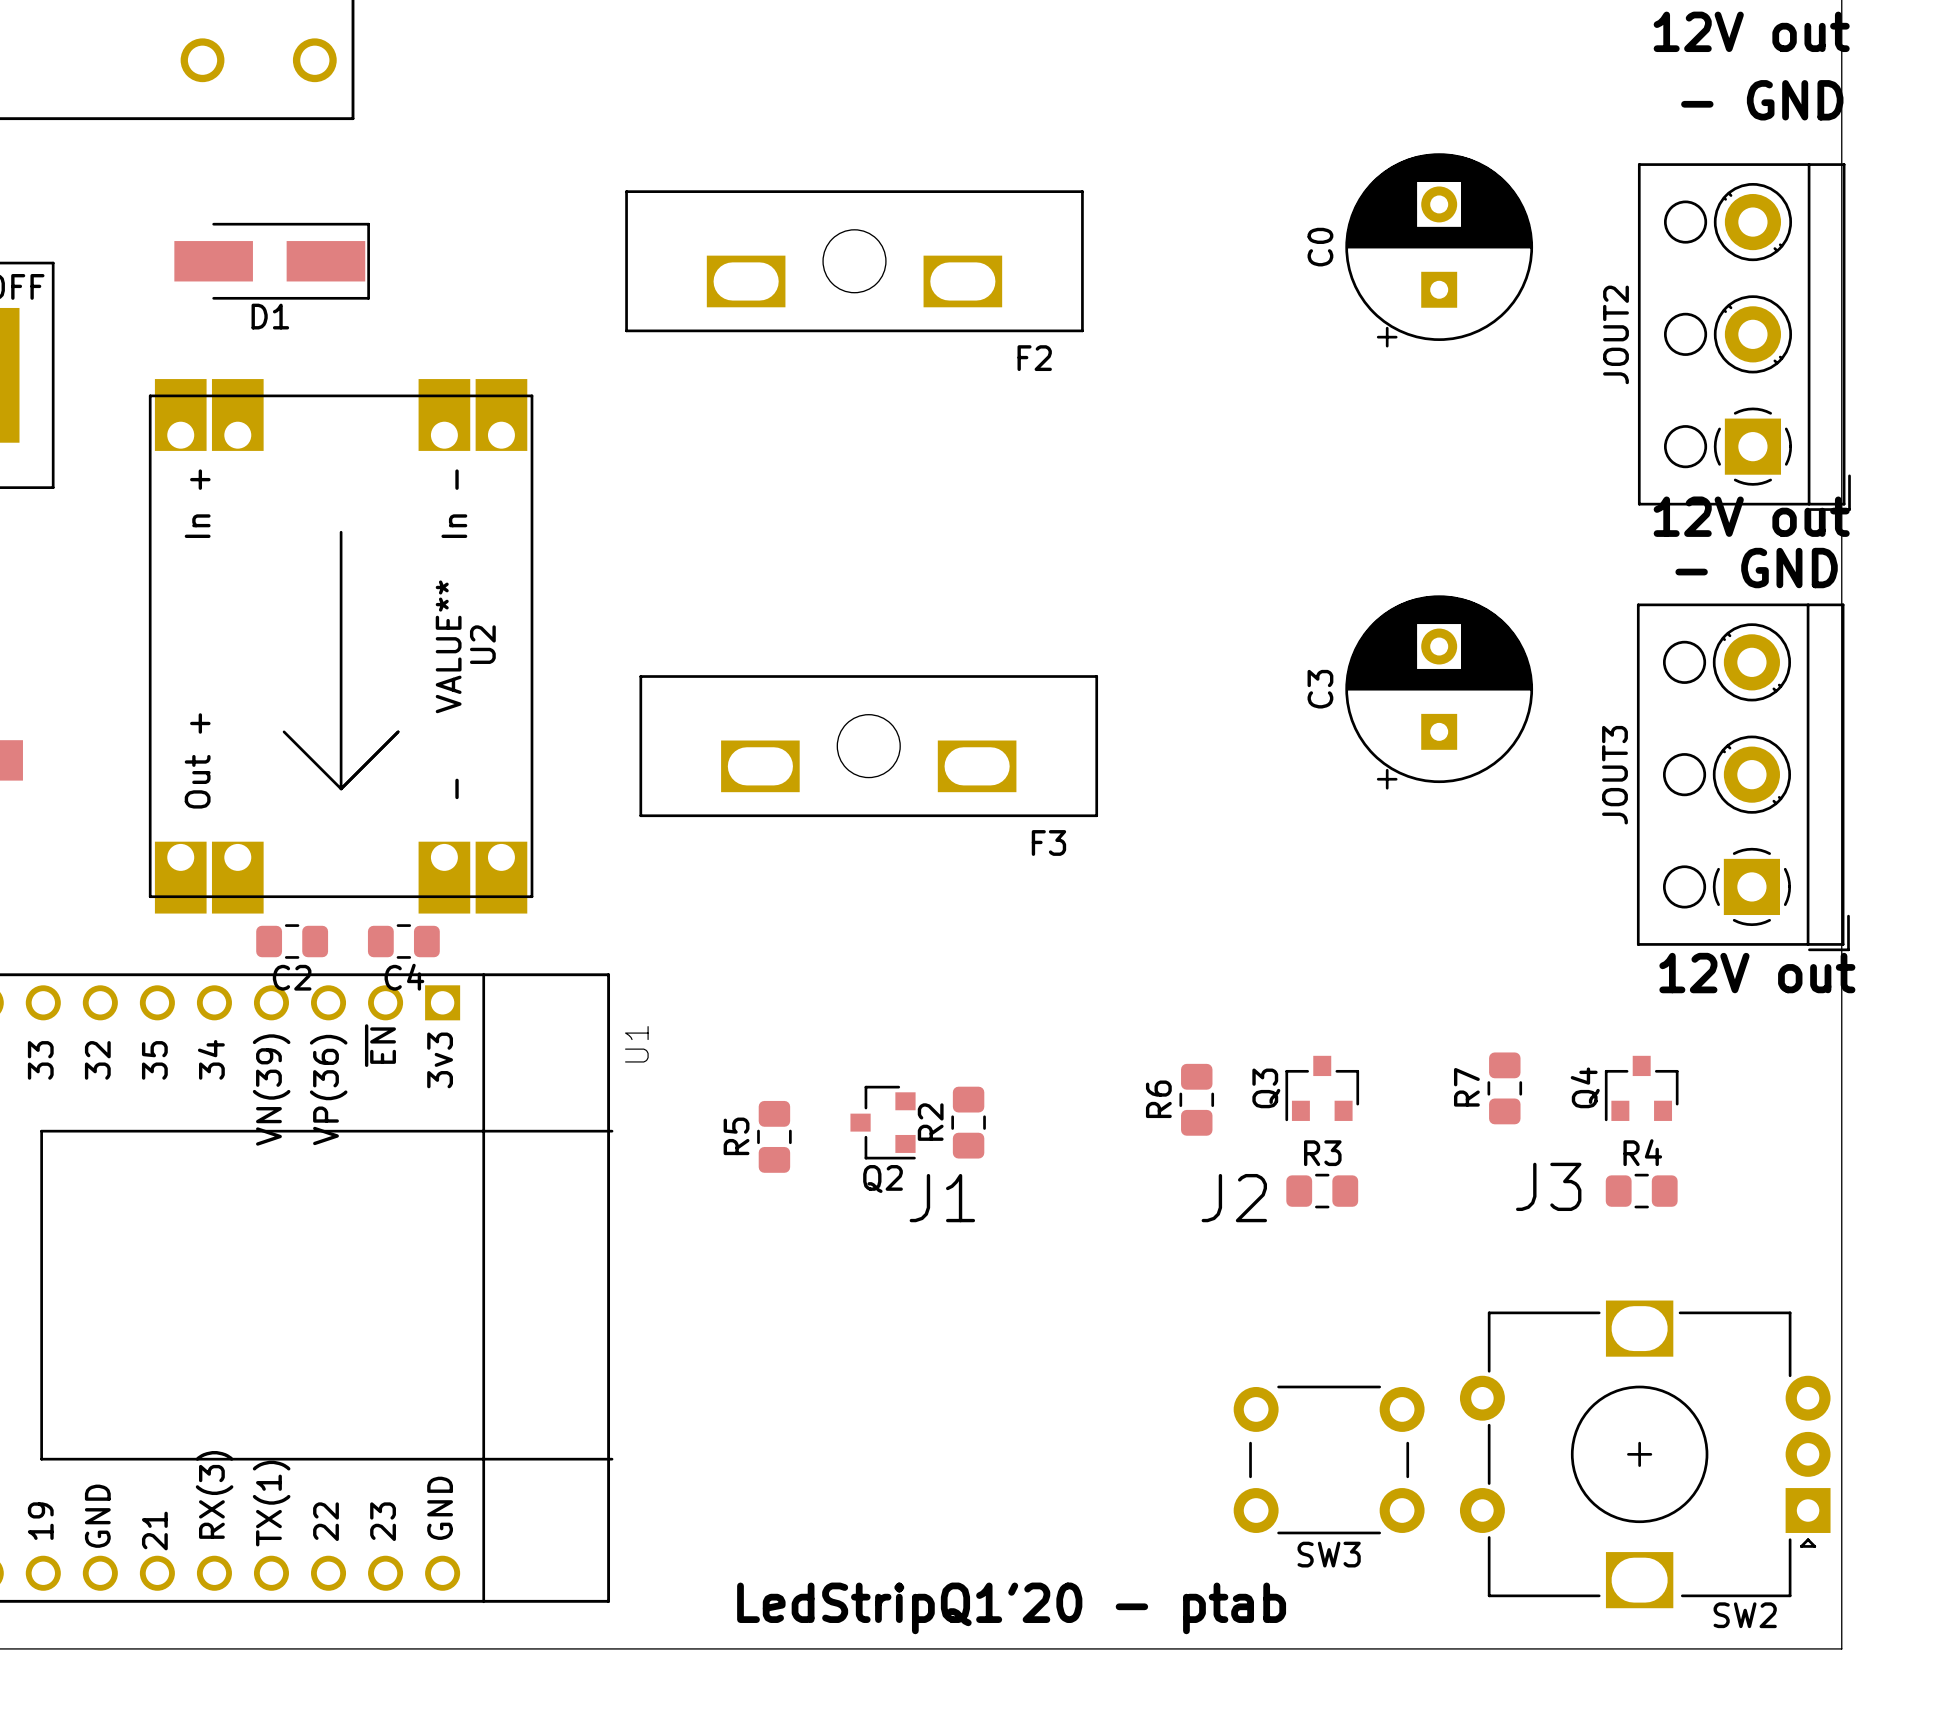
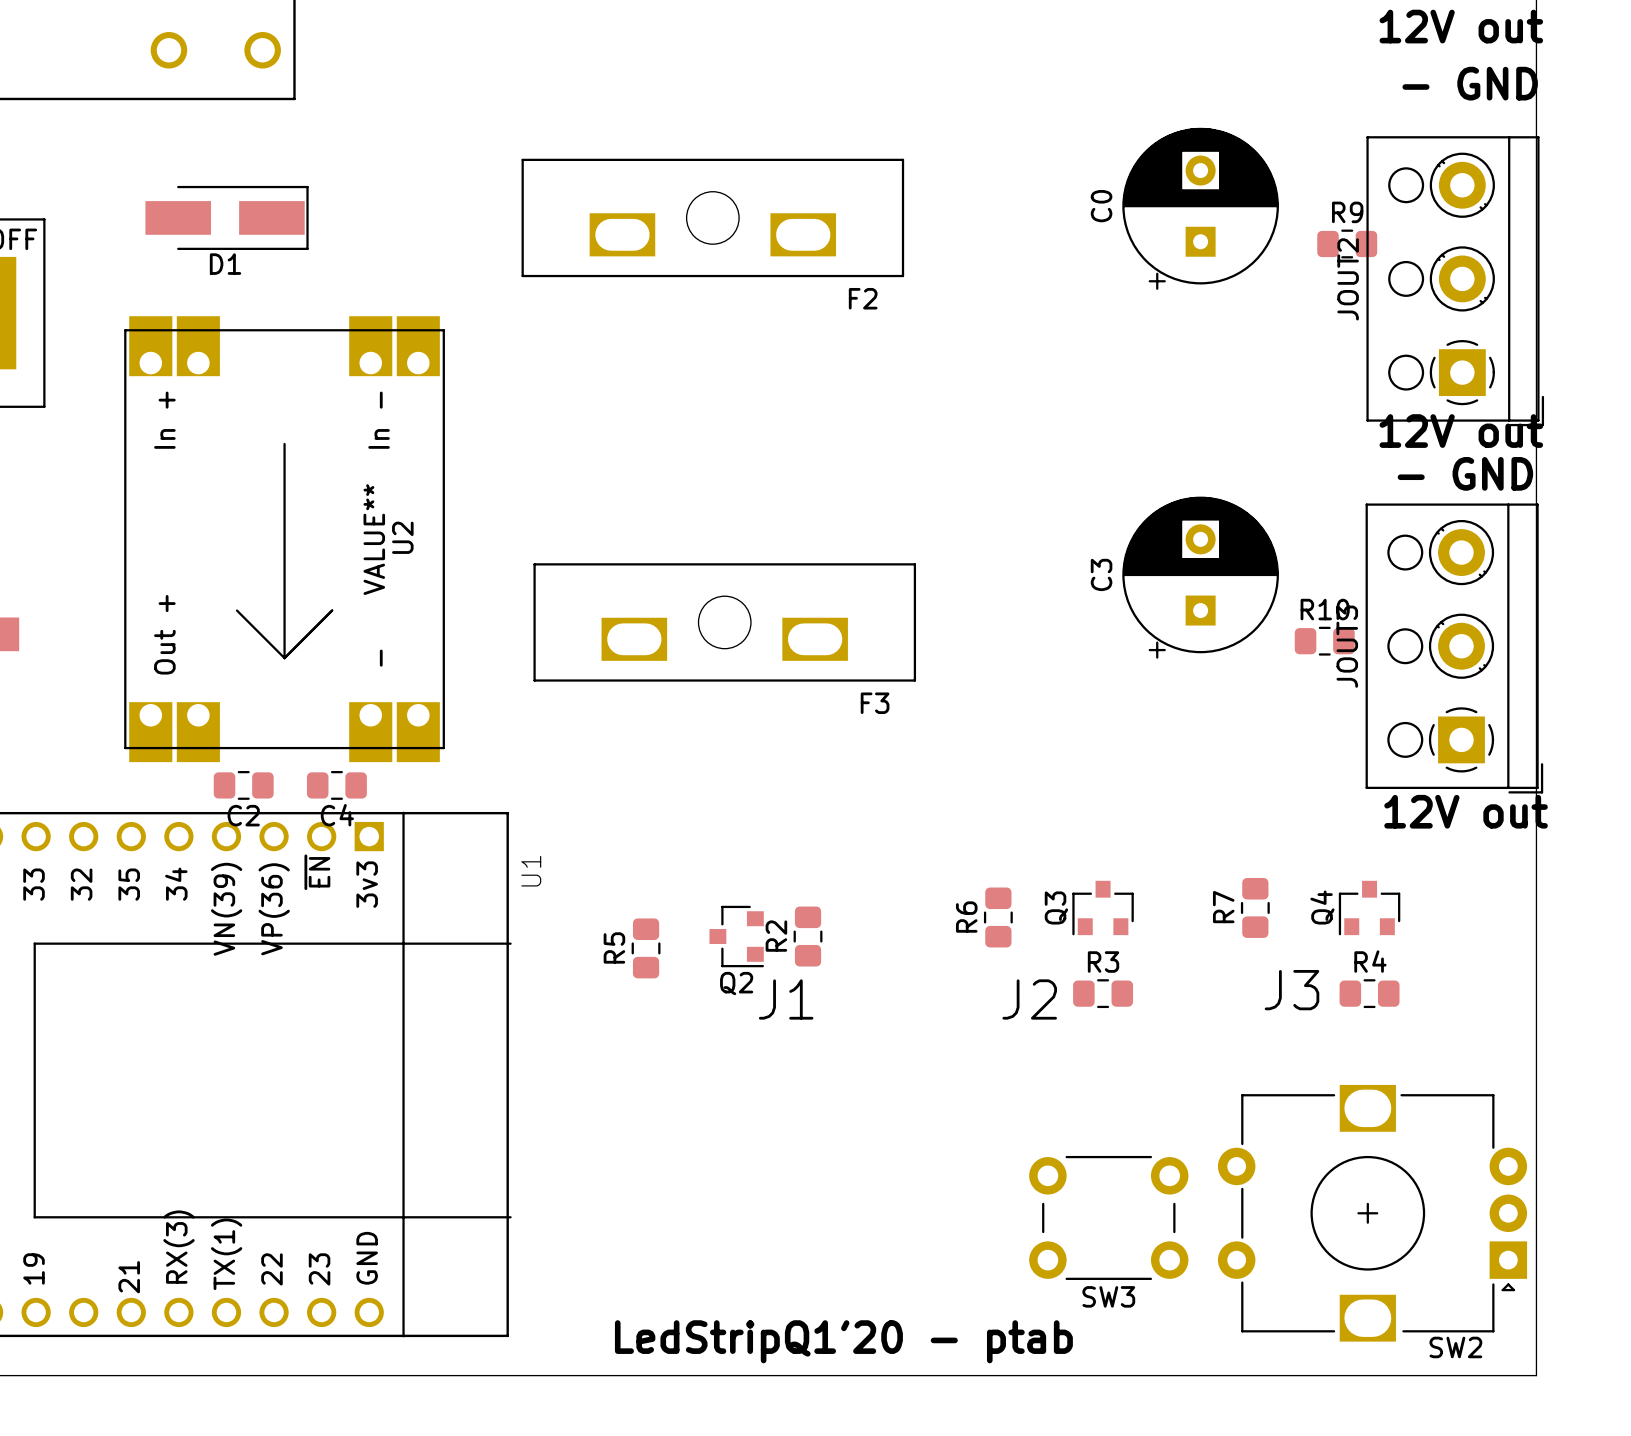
R9: none -> (1347, 243)
R10: none -> (1324, 641)
U1 text: GND (97, 1516) -> none

